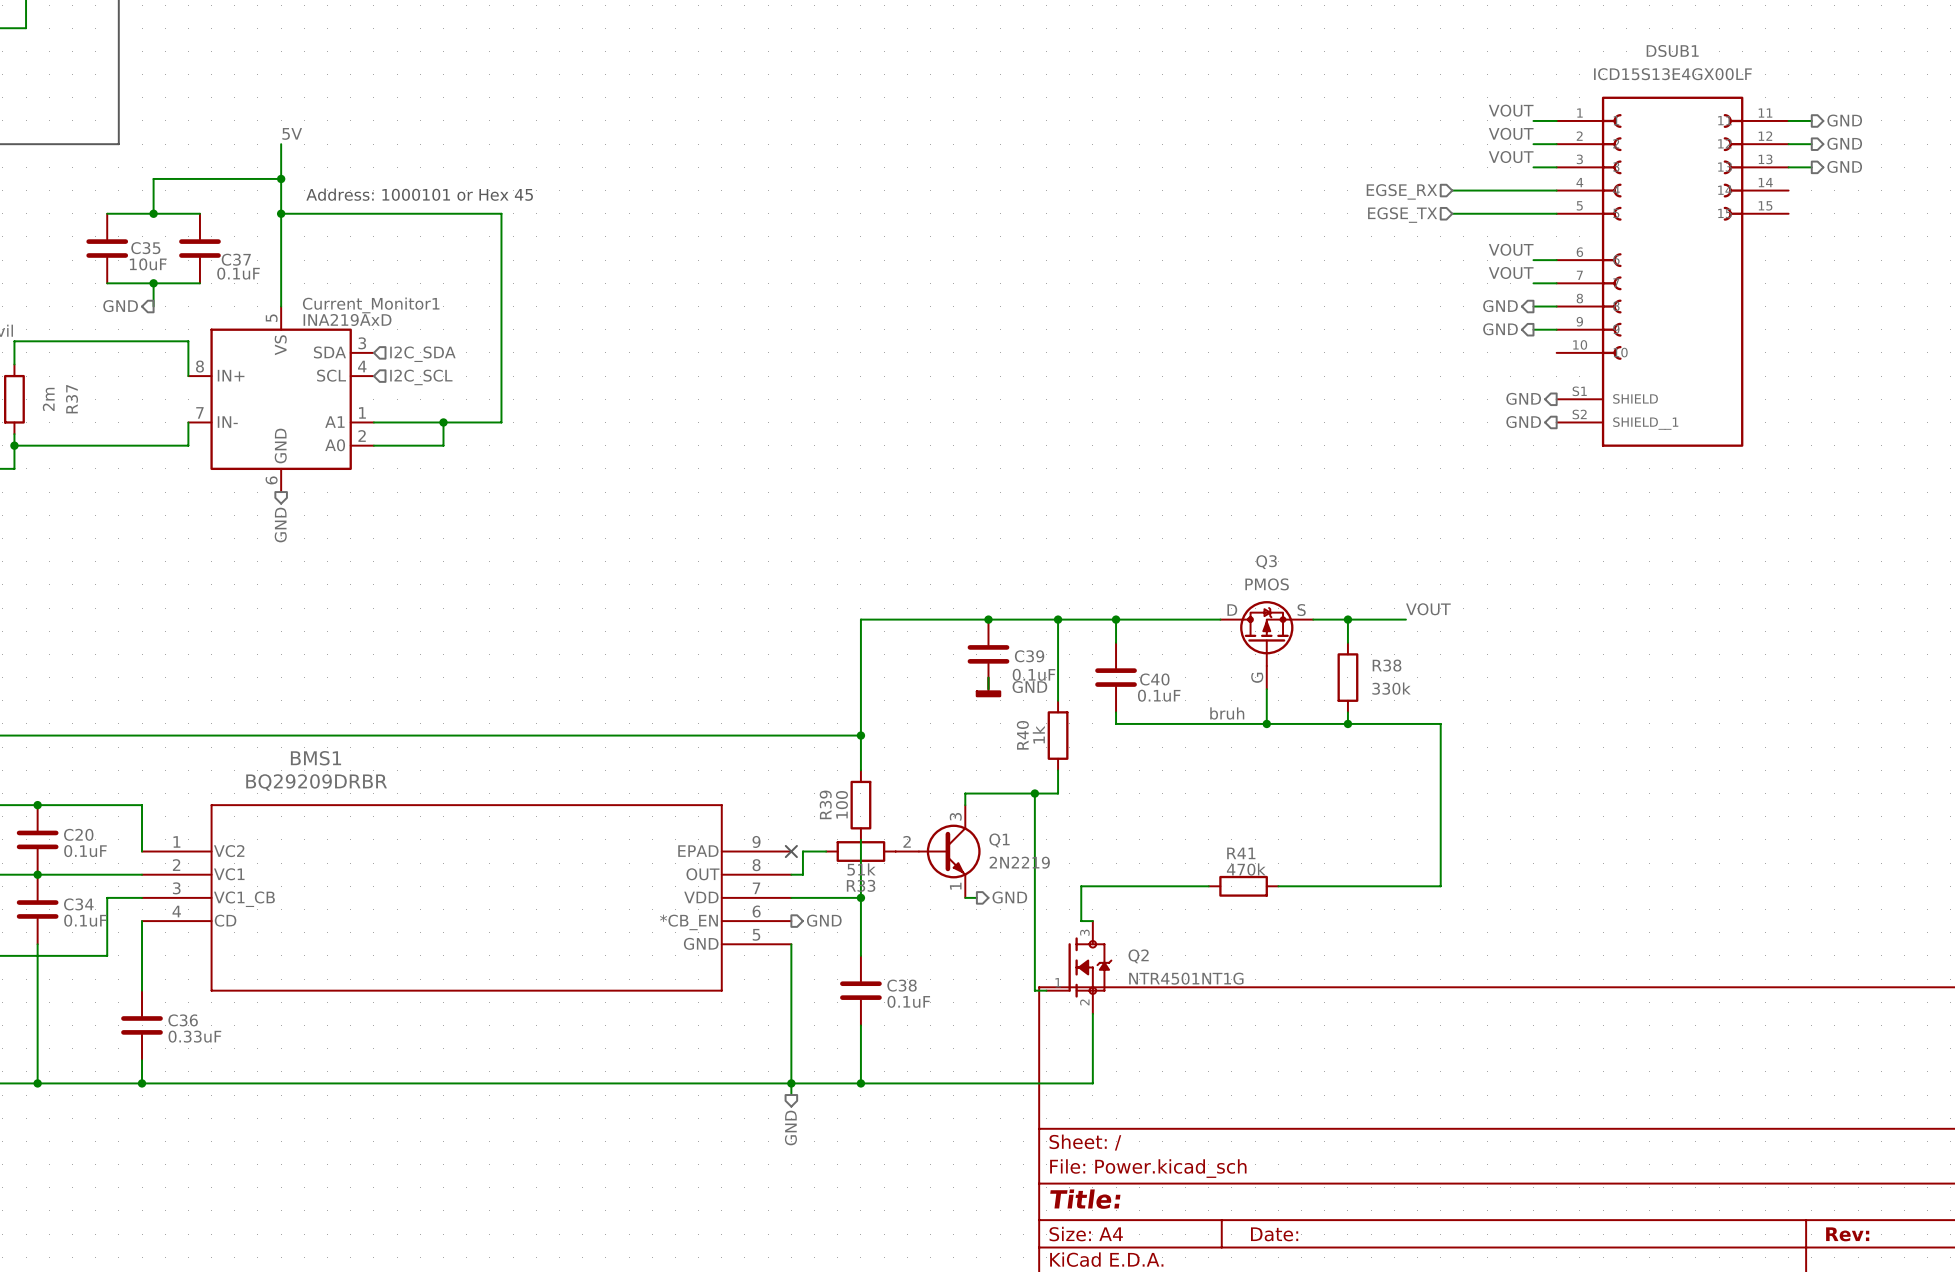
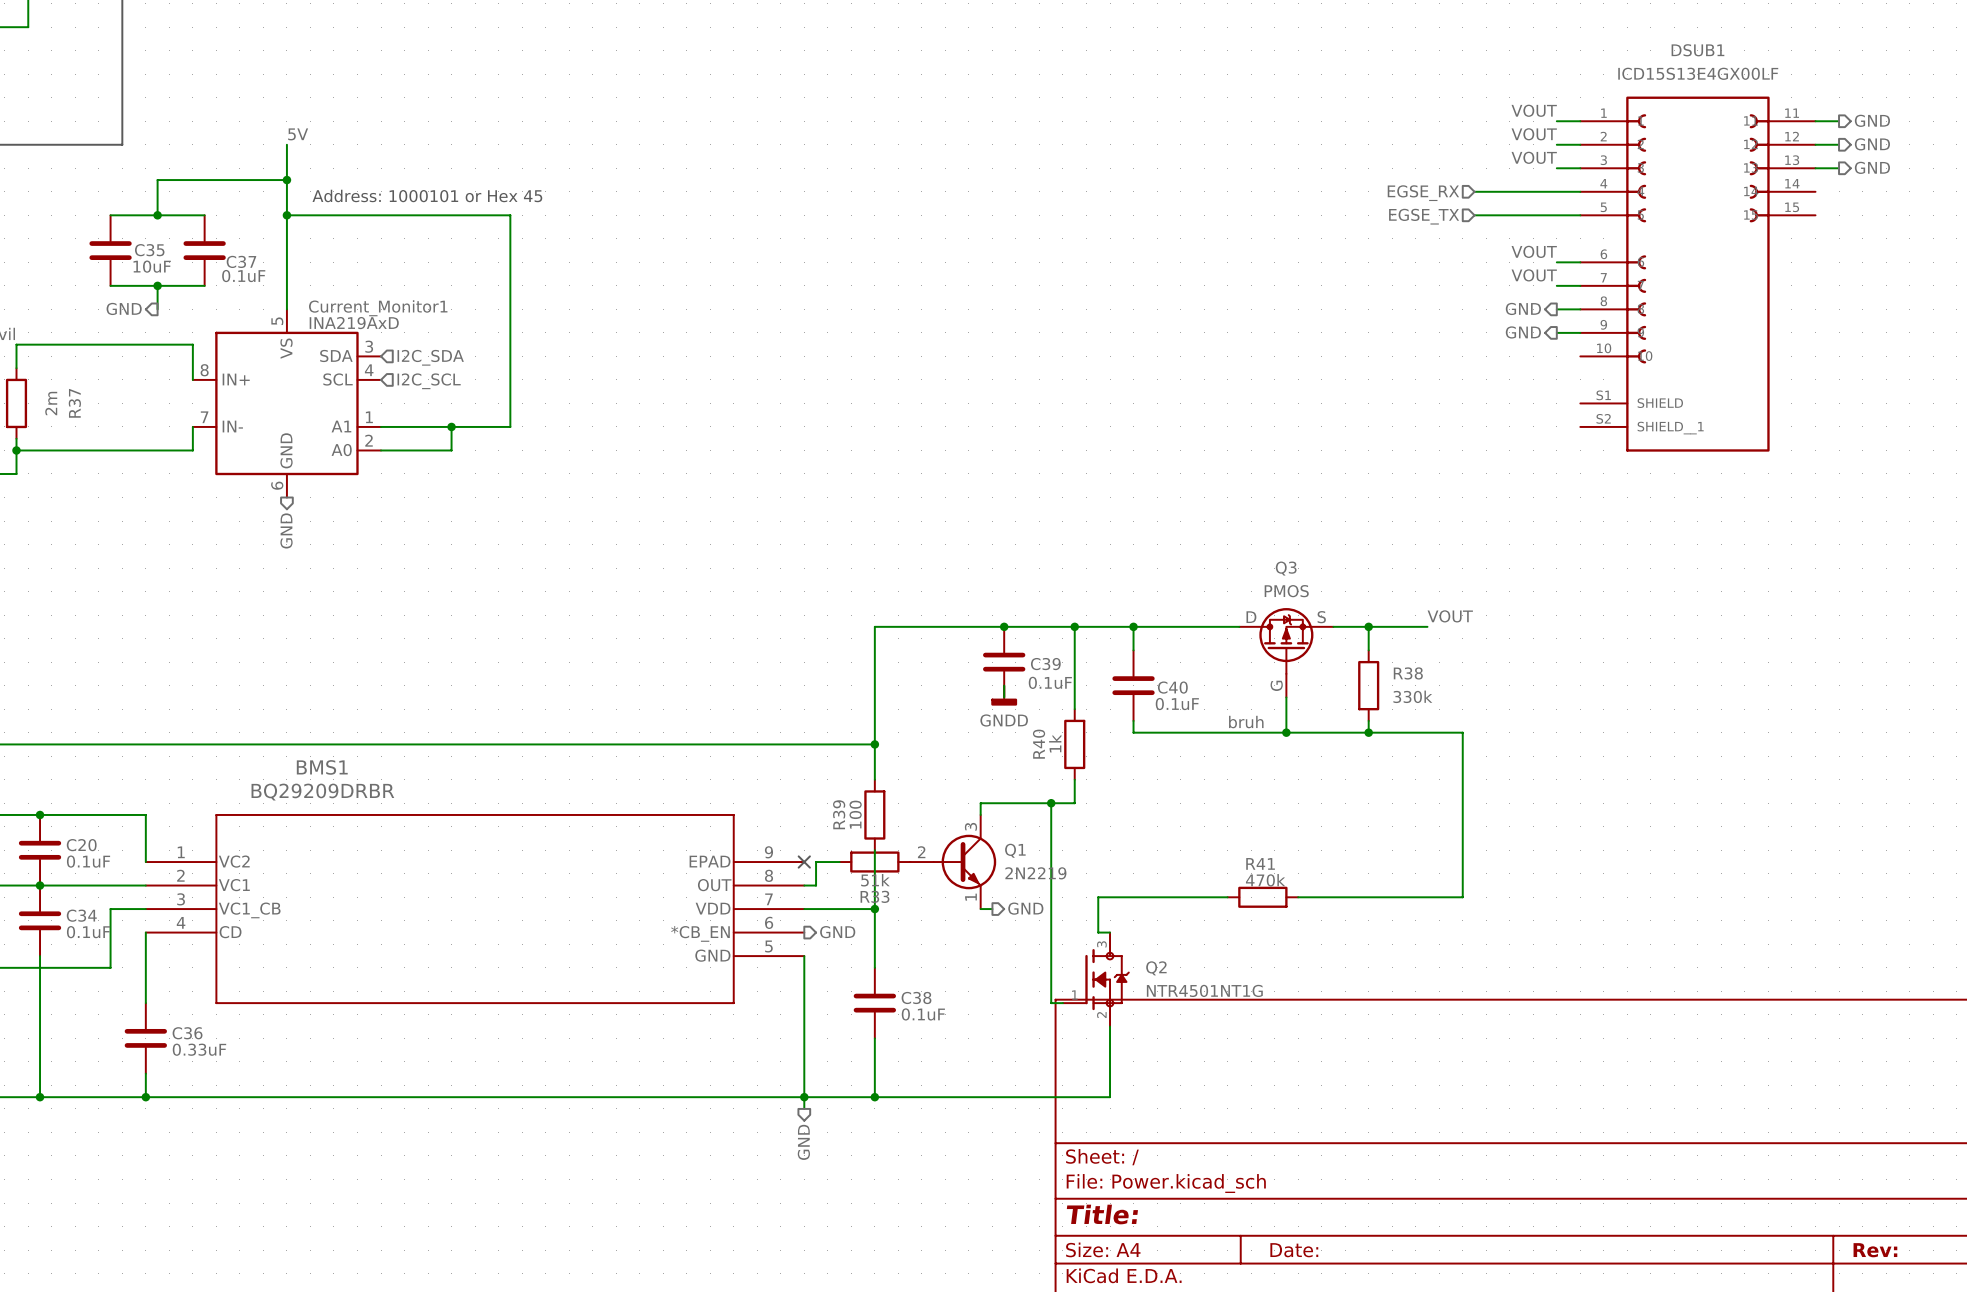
hierarchical label: GND (1523, 398) -> none
hierarchical label: GND (1523, 422) -> none
power symbol: GND (988, 687) -> GNDD (1004, 695)

